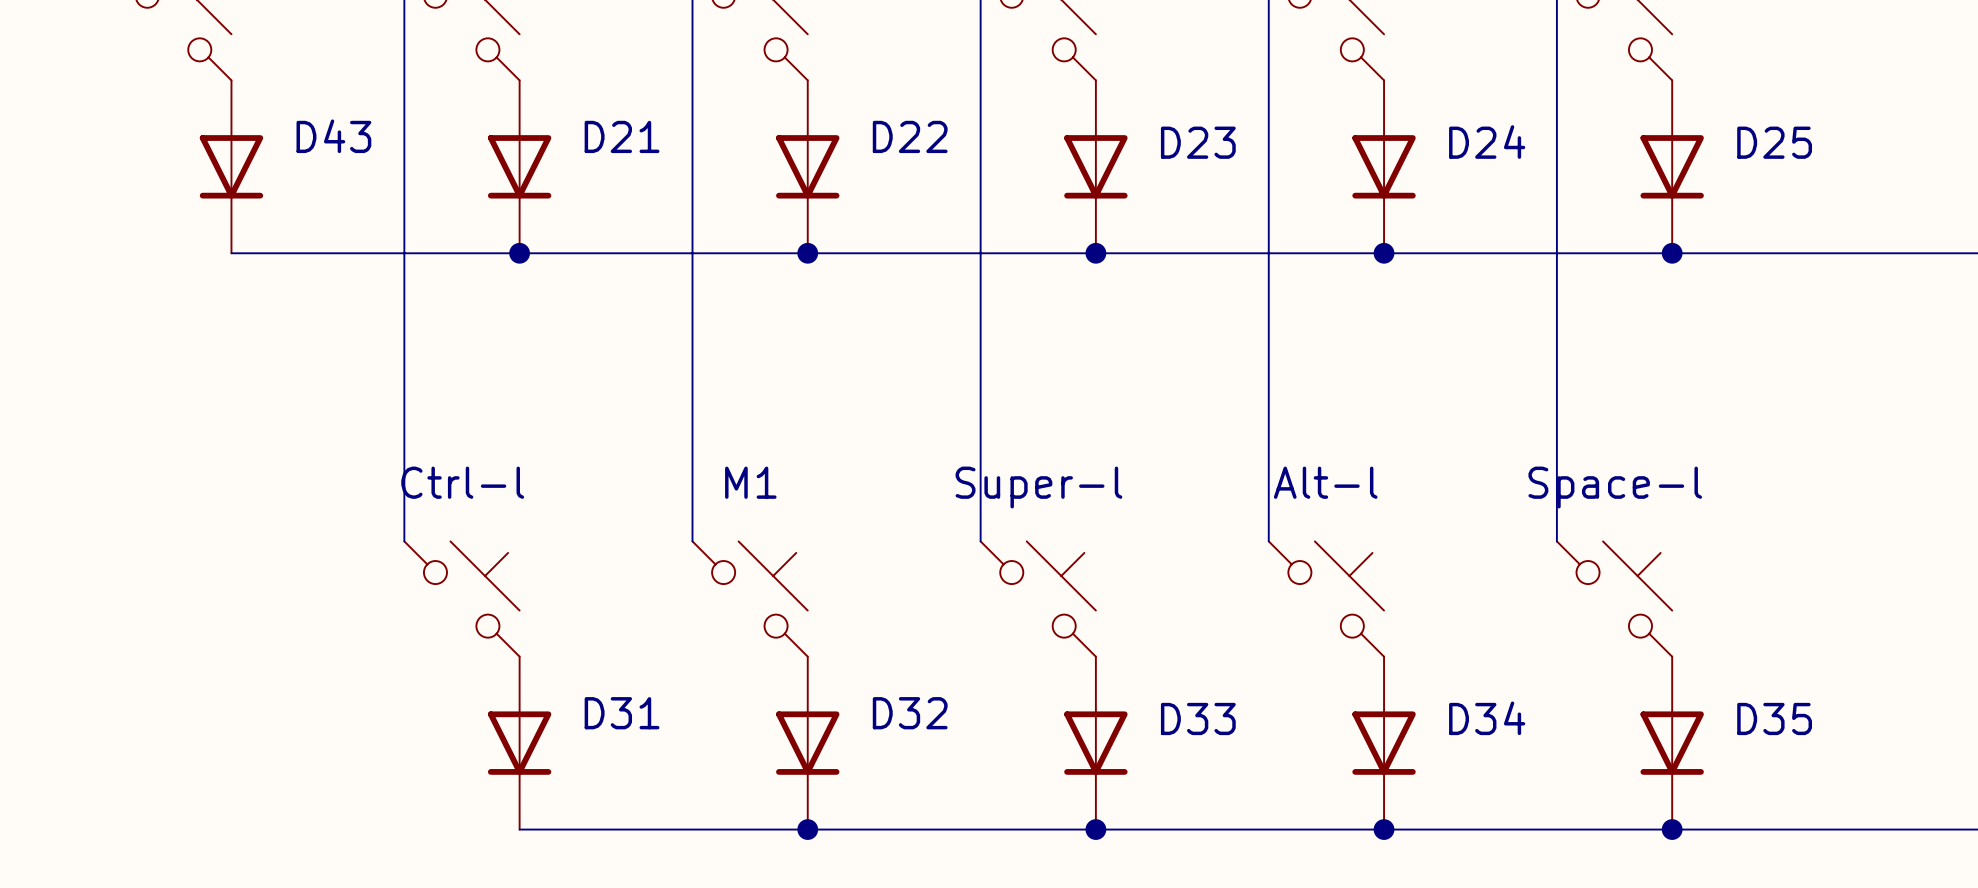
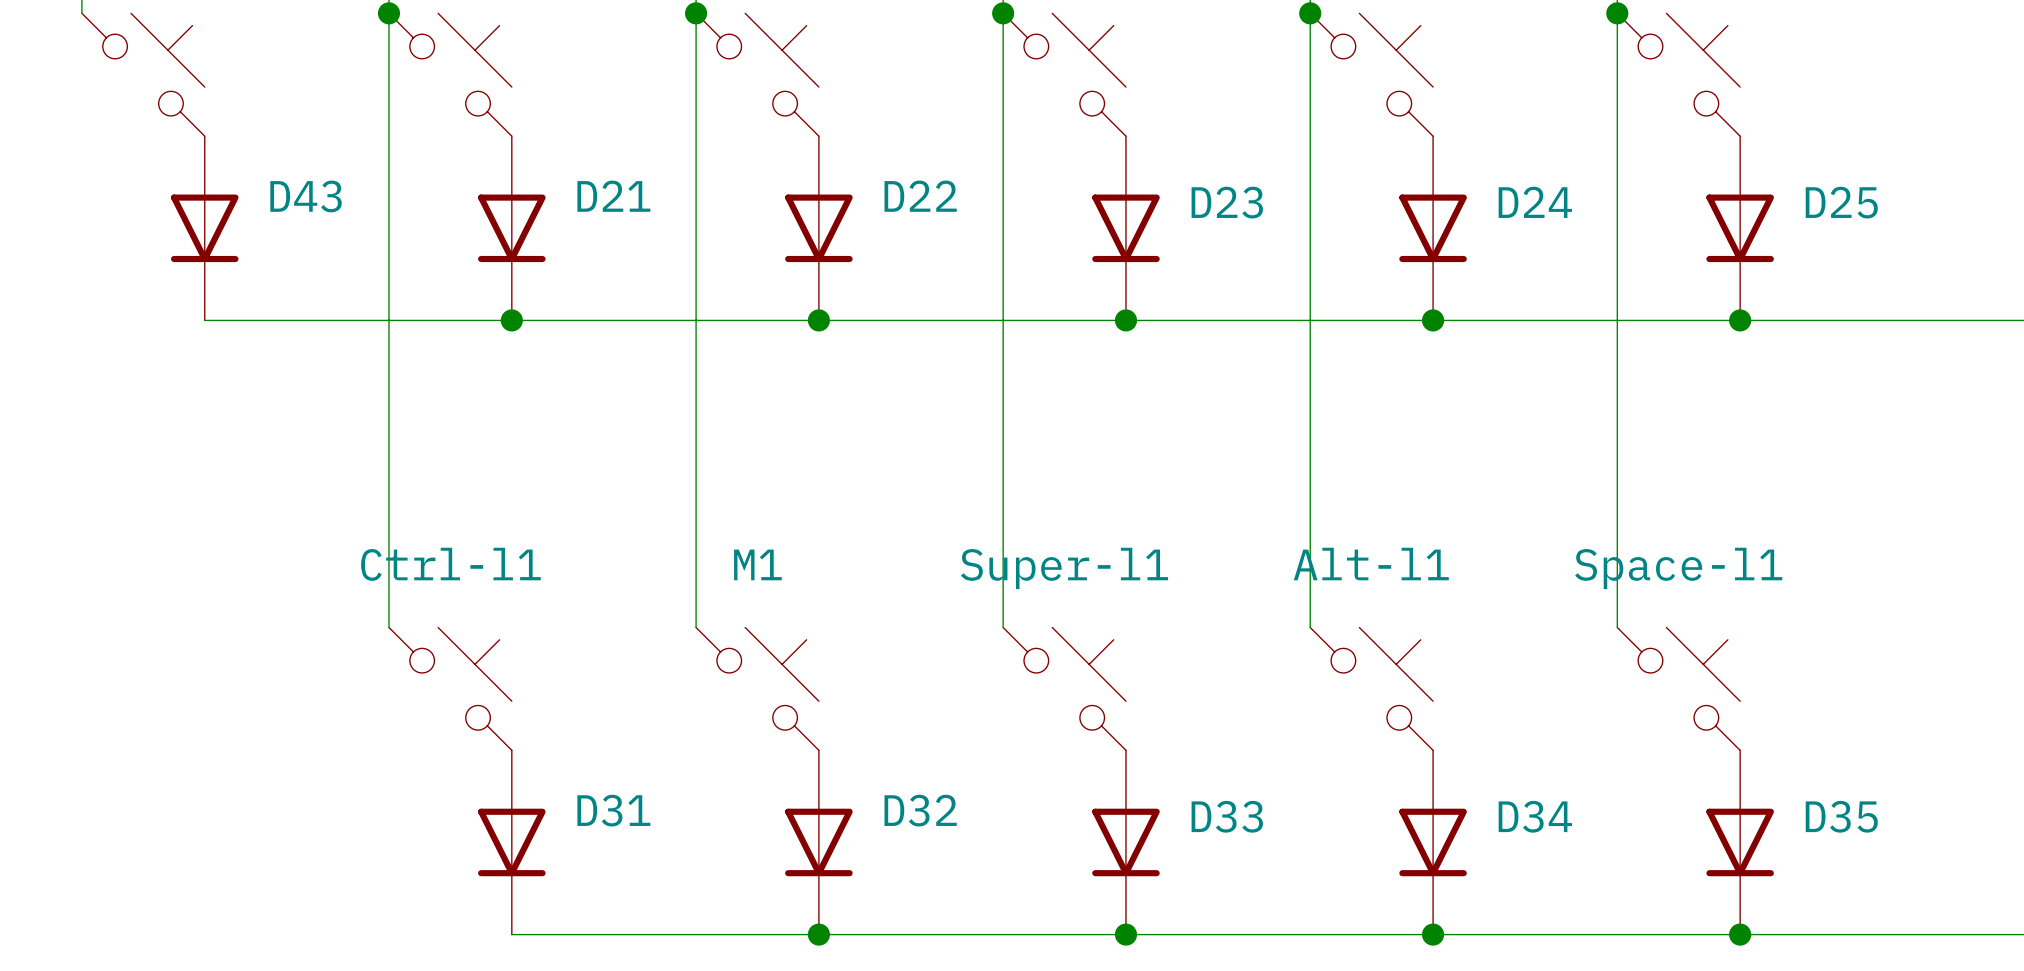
Ctrl-l name: Ctrl-l (462, 482) -> Ctrl-l1 (450, 564)
Alt-l name: Alt-l (1325, 482) -> Alt-l1 (1371, 564)
Super-l name: Super-l (1038, 487) -> Super-l1 (1064, 568)
Space-l name: Space-l (1615, 487) -> Space-l1 (1678, 568)

